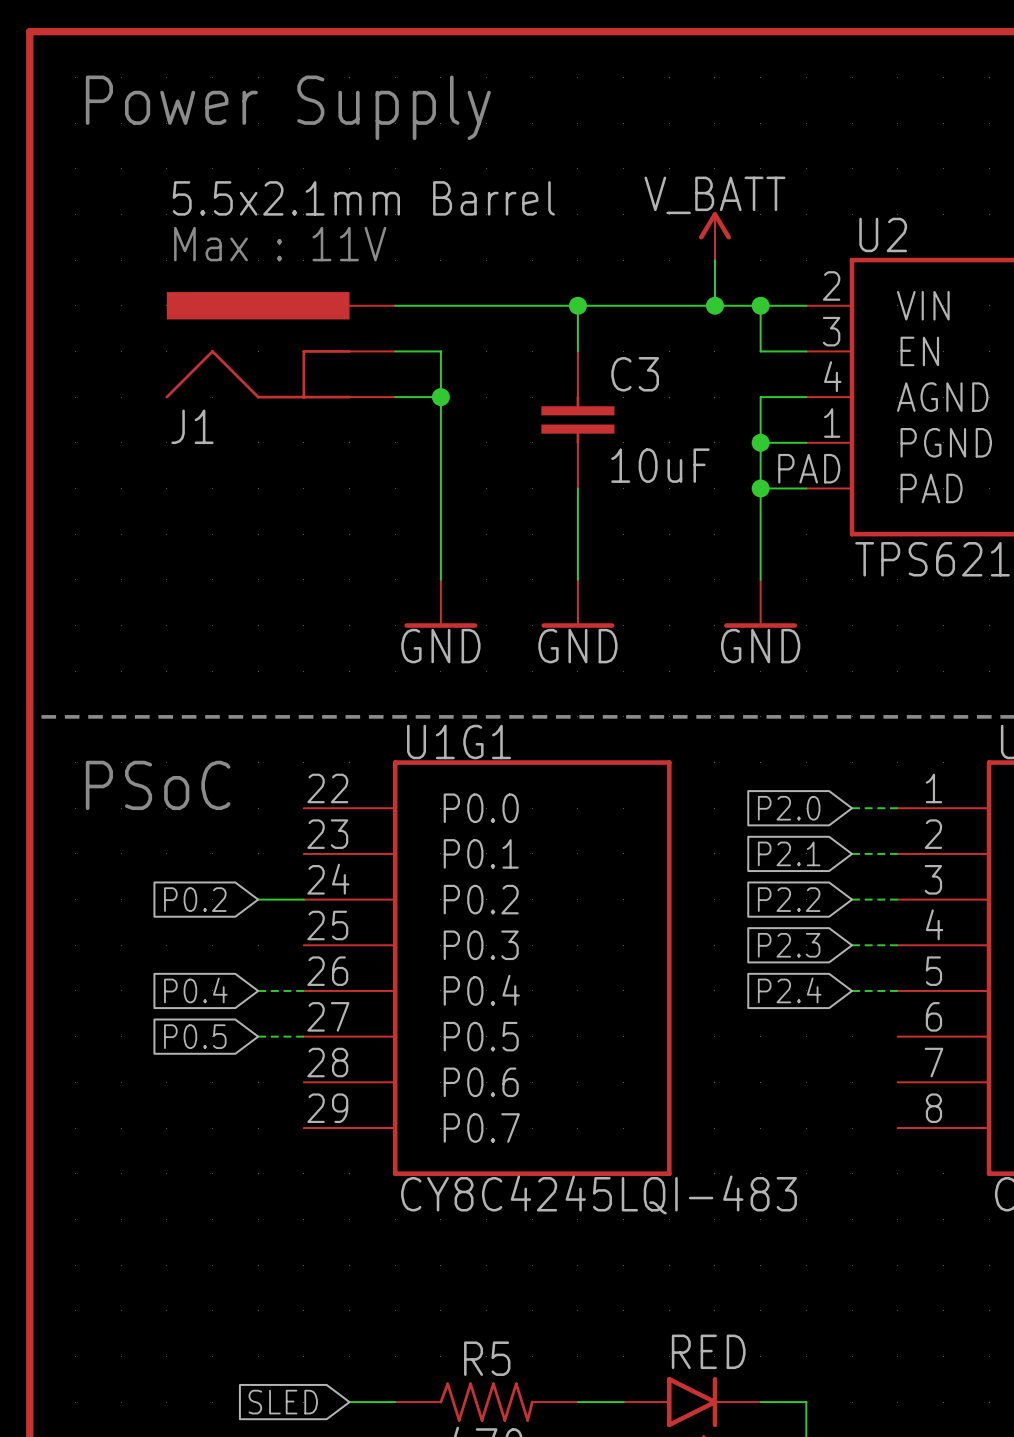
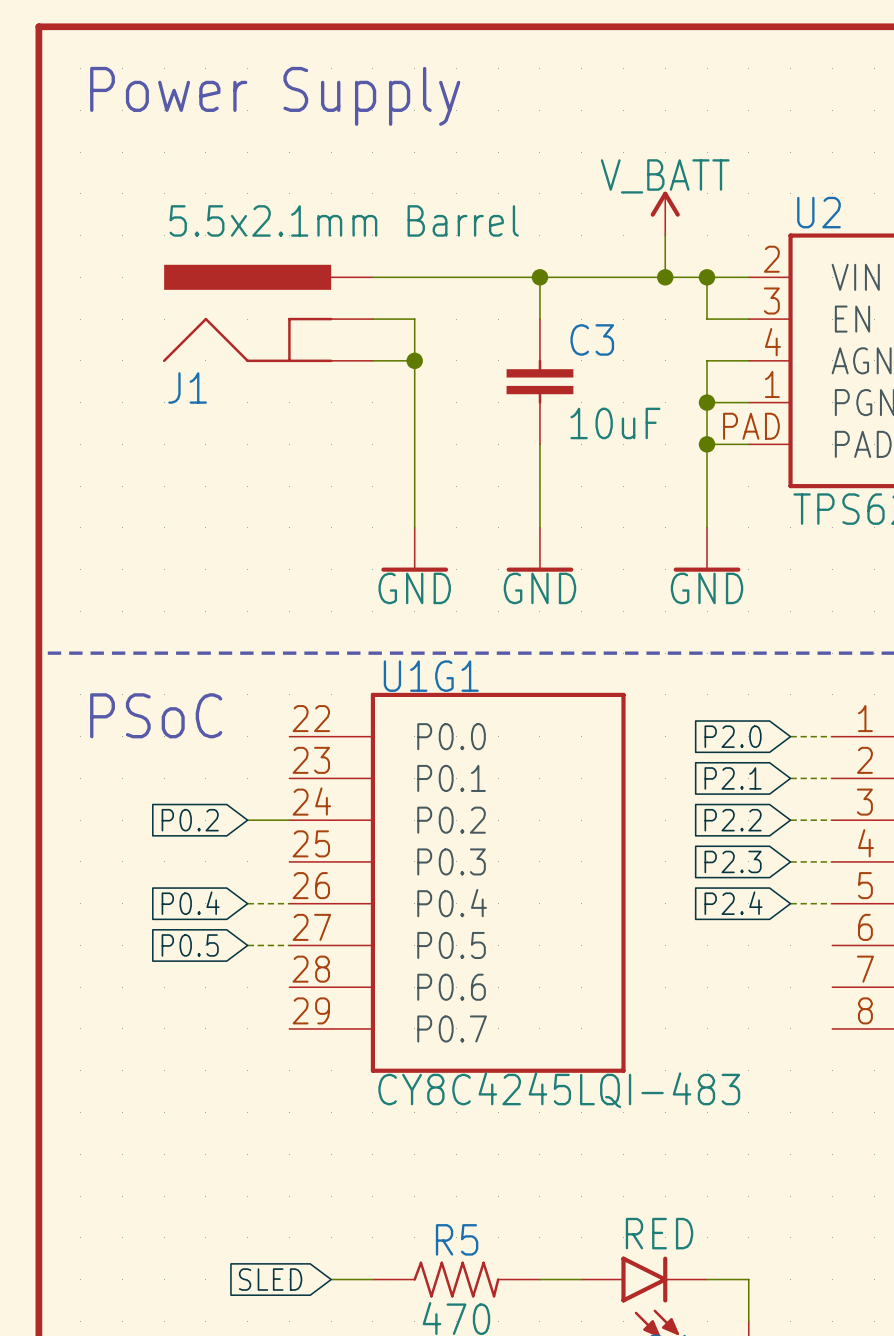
J1 value position: 5.5x2.1mm Barrel (363, 198) -> 5.5x2.1mm Barrel (344, 220)
text: Max : 11V (280, 244) -> none

